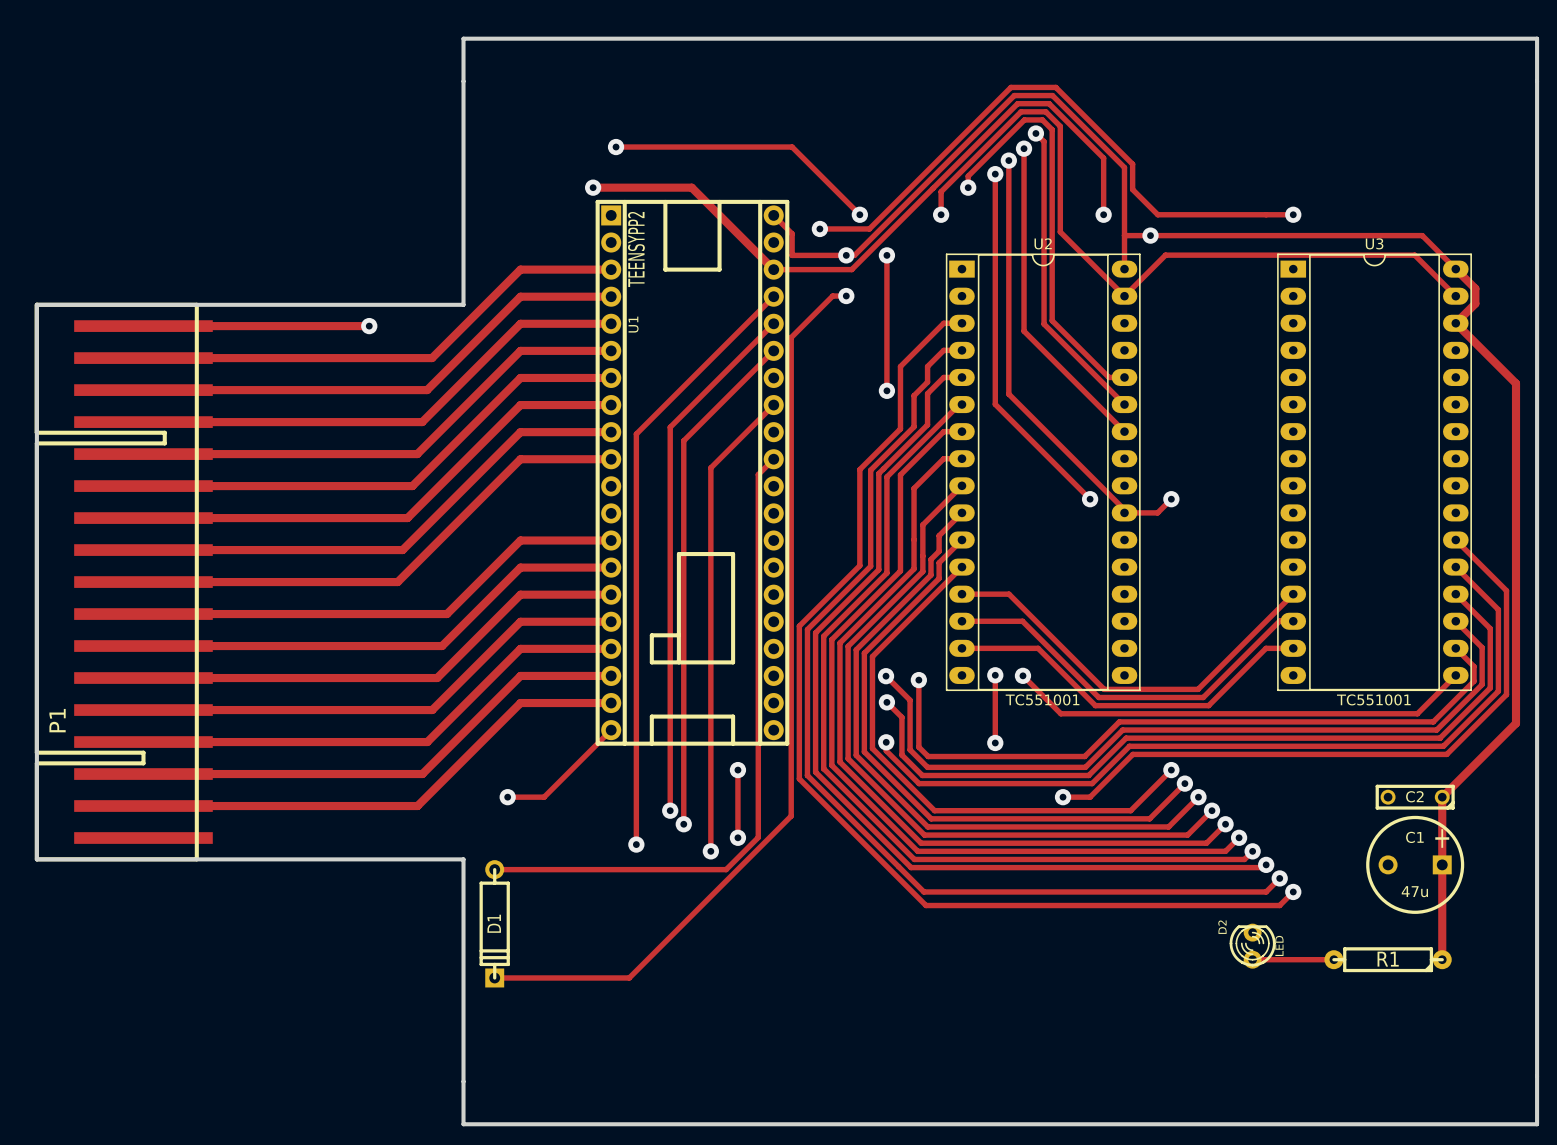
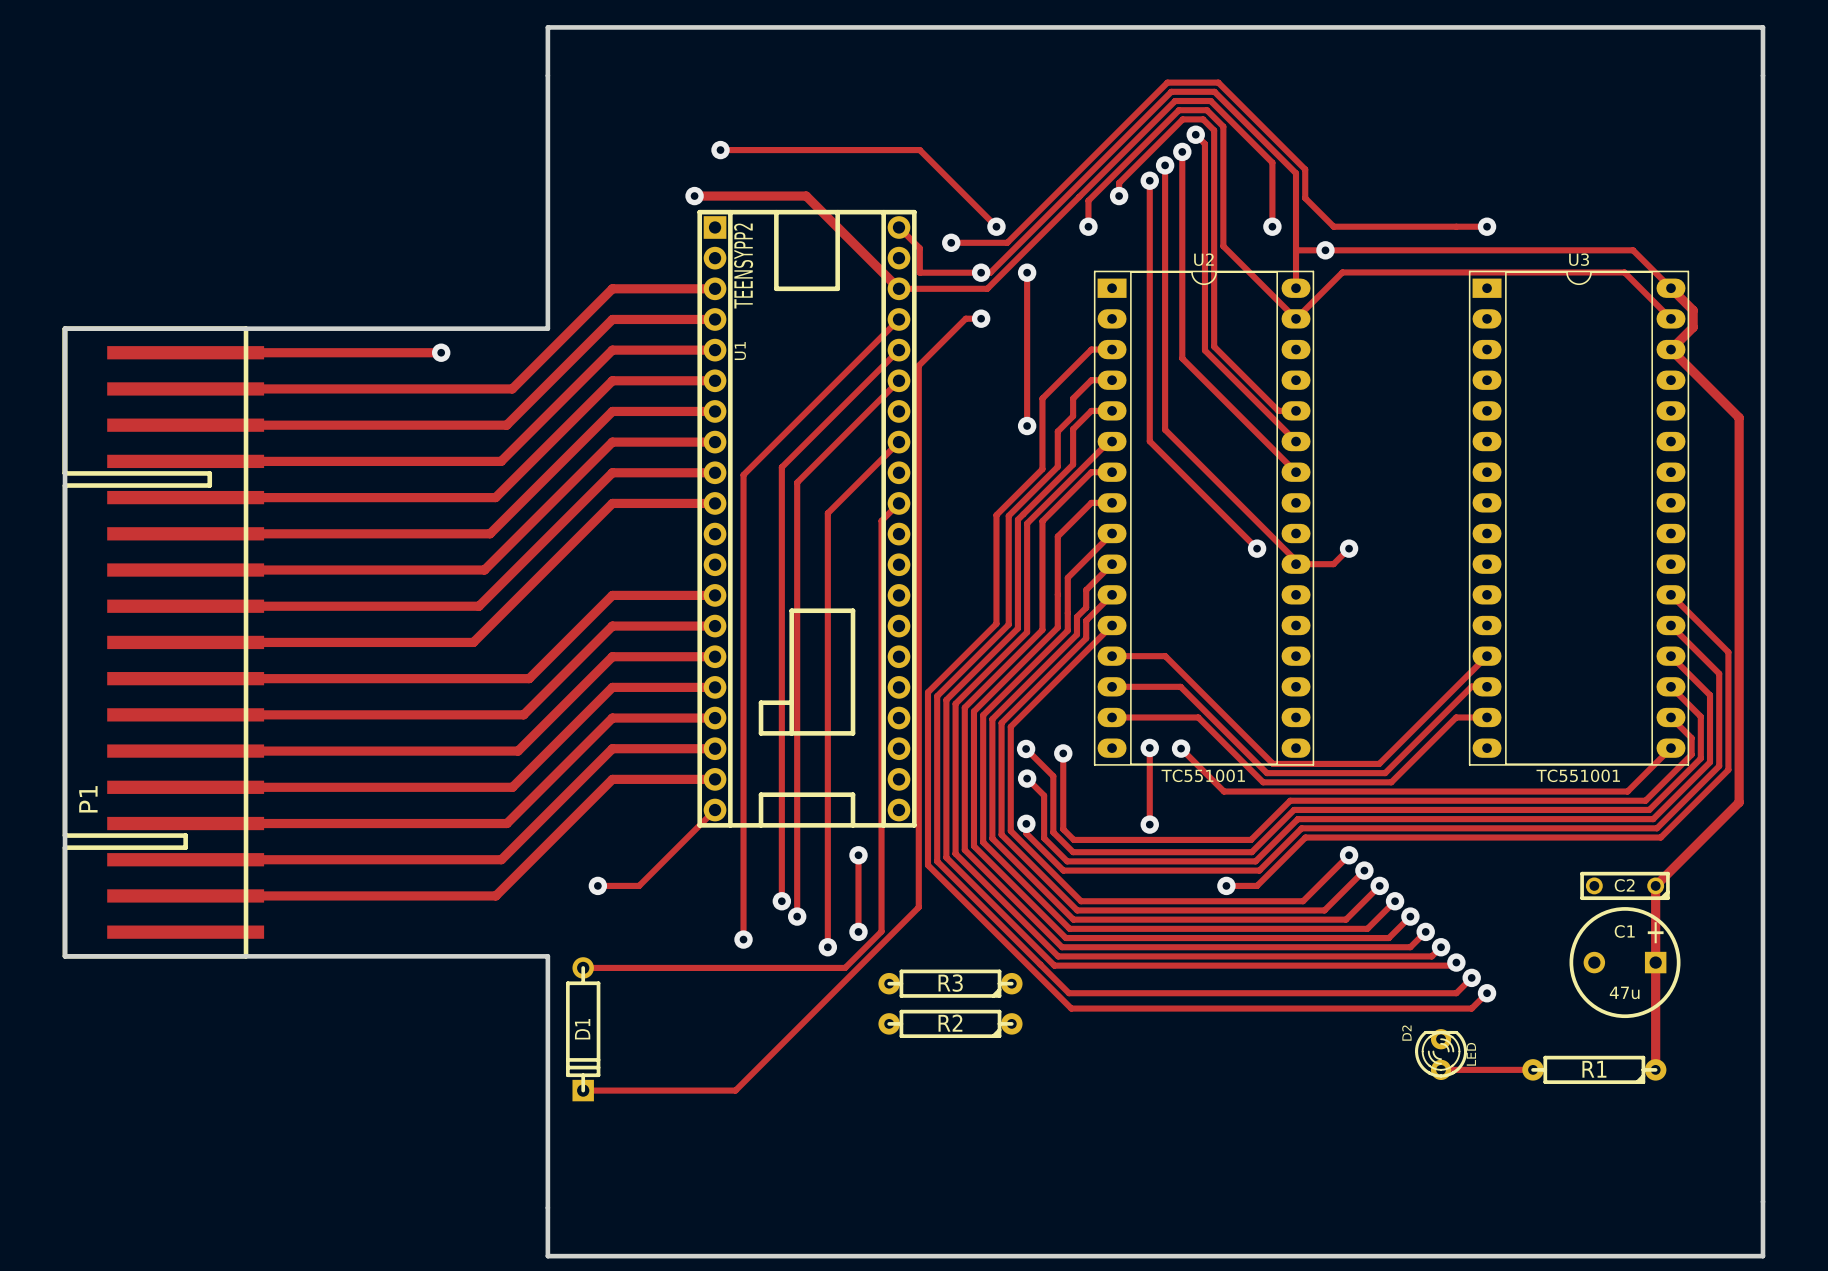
R3: none -> (950, 983)
R2: none -> (950, 1023)

